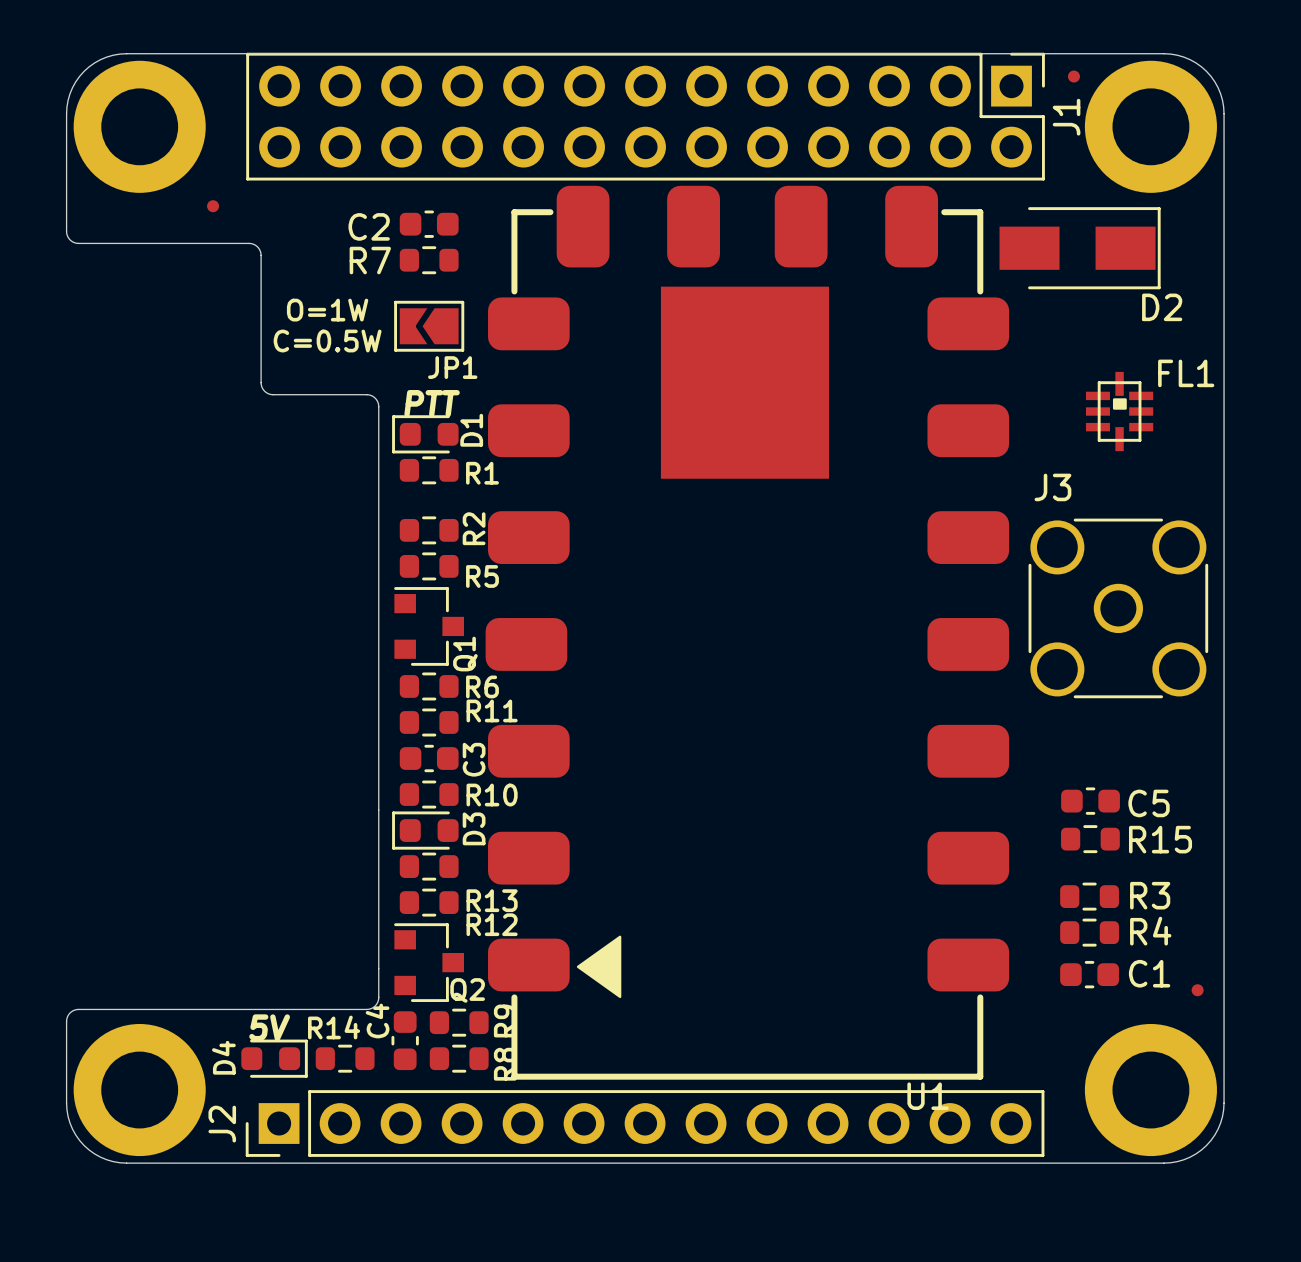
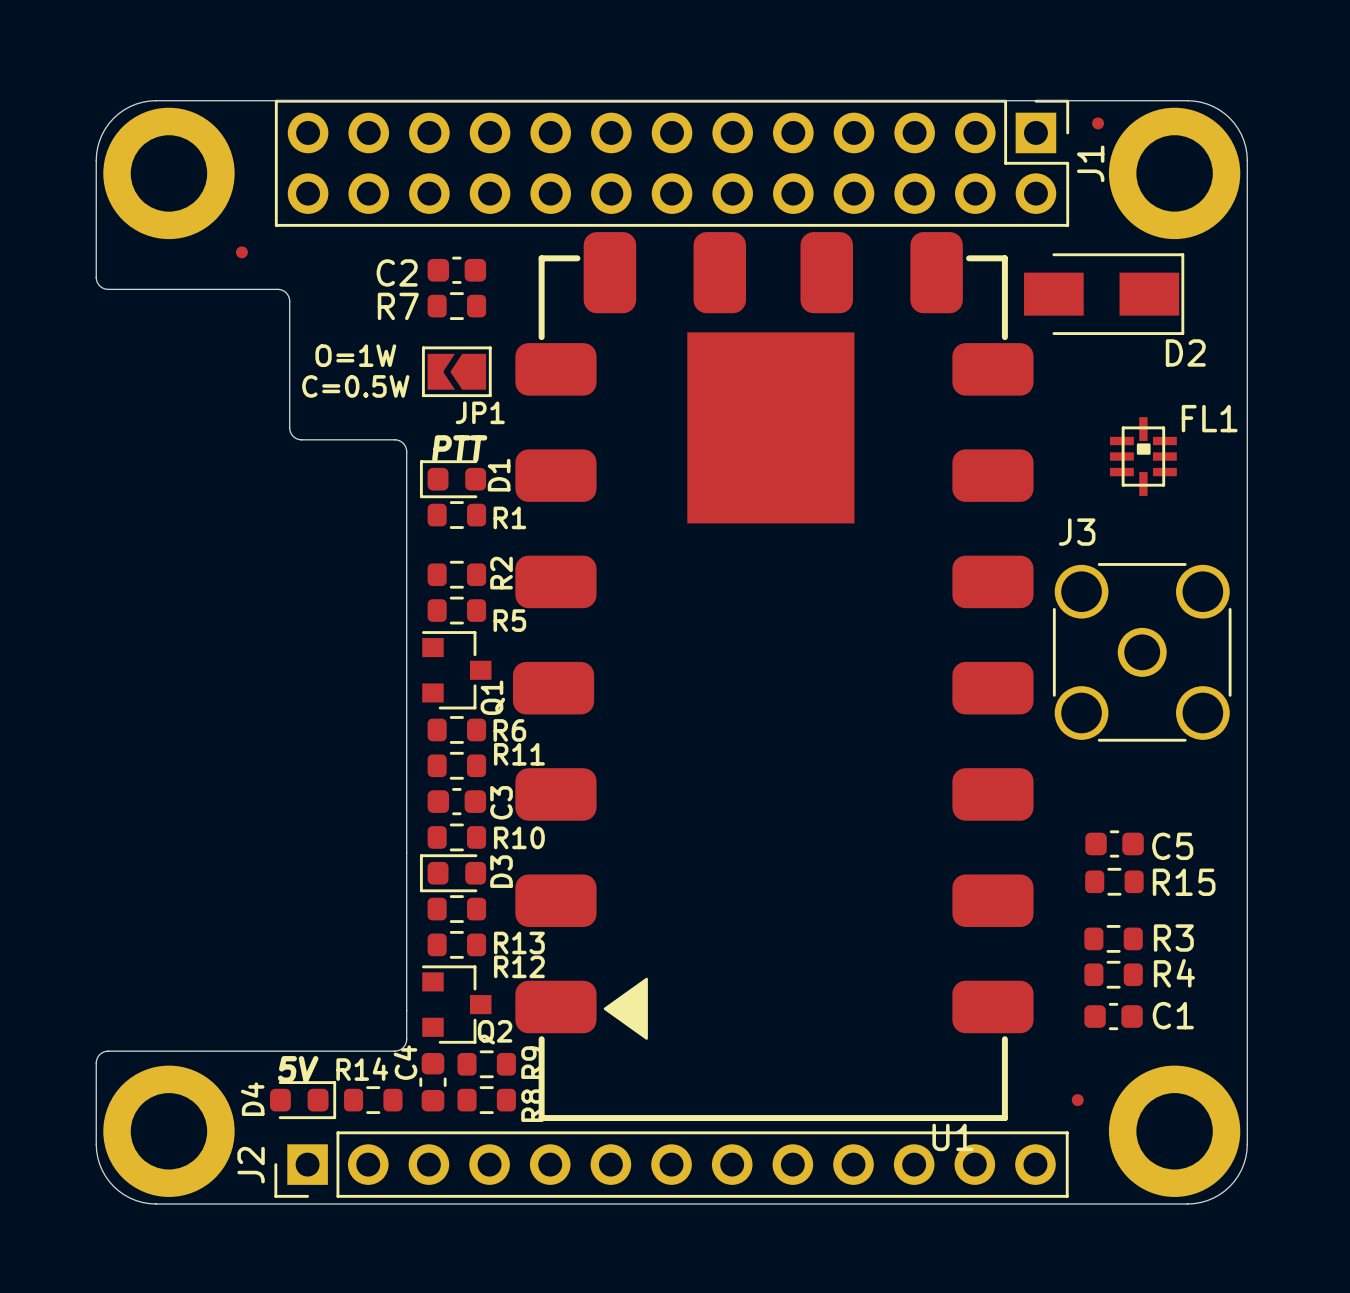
part position: (1197, 990) -> (1077, 1100)

